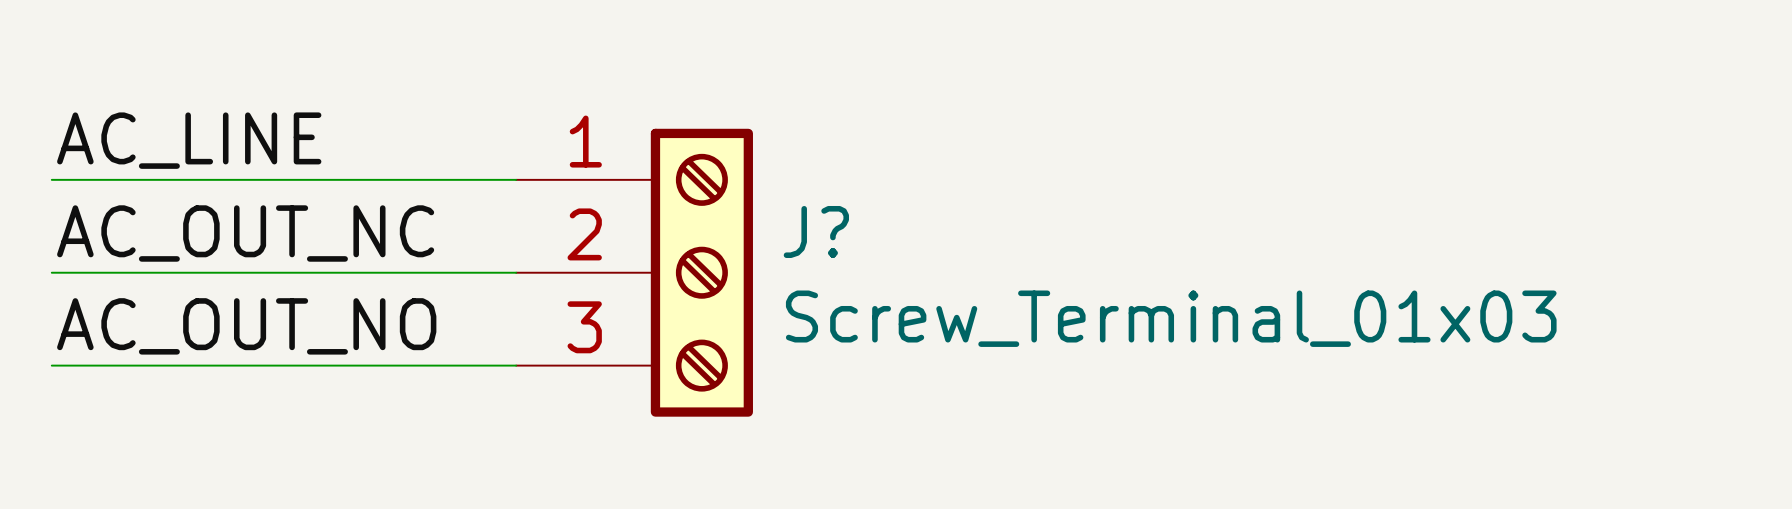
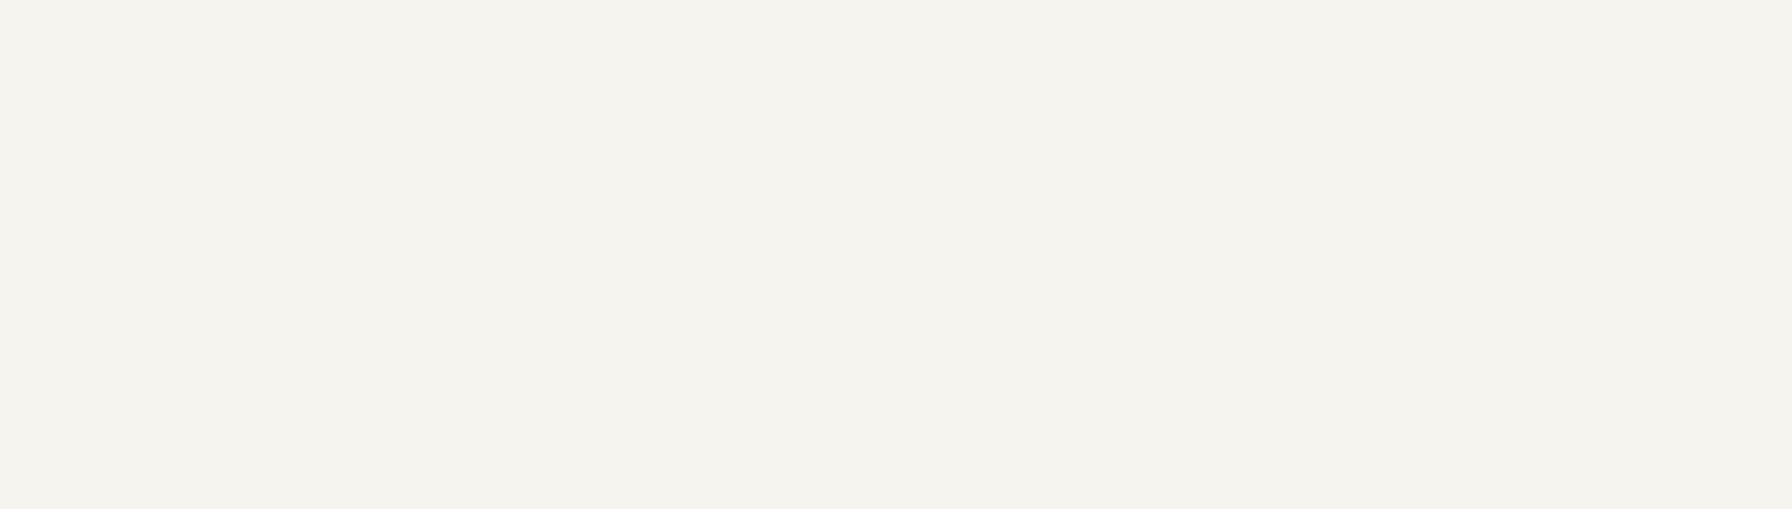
label: AC_LINE (189, 140) -> none
wire: (51, 179) (516, 179) -> none
label: AC_OUT_NC (245, 233) -> none
wire: (51, 272) (516, 272) -> none
J?: Screw_Terminal_01x03 (634, 272) -> none
label: AC_OUT_NO (246, 326) -> none
wire: (51, 365) (516, 365) -> none

